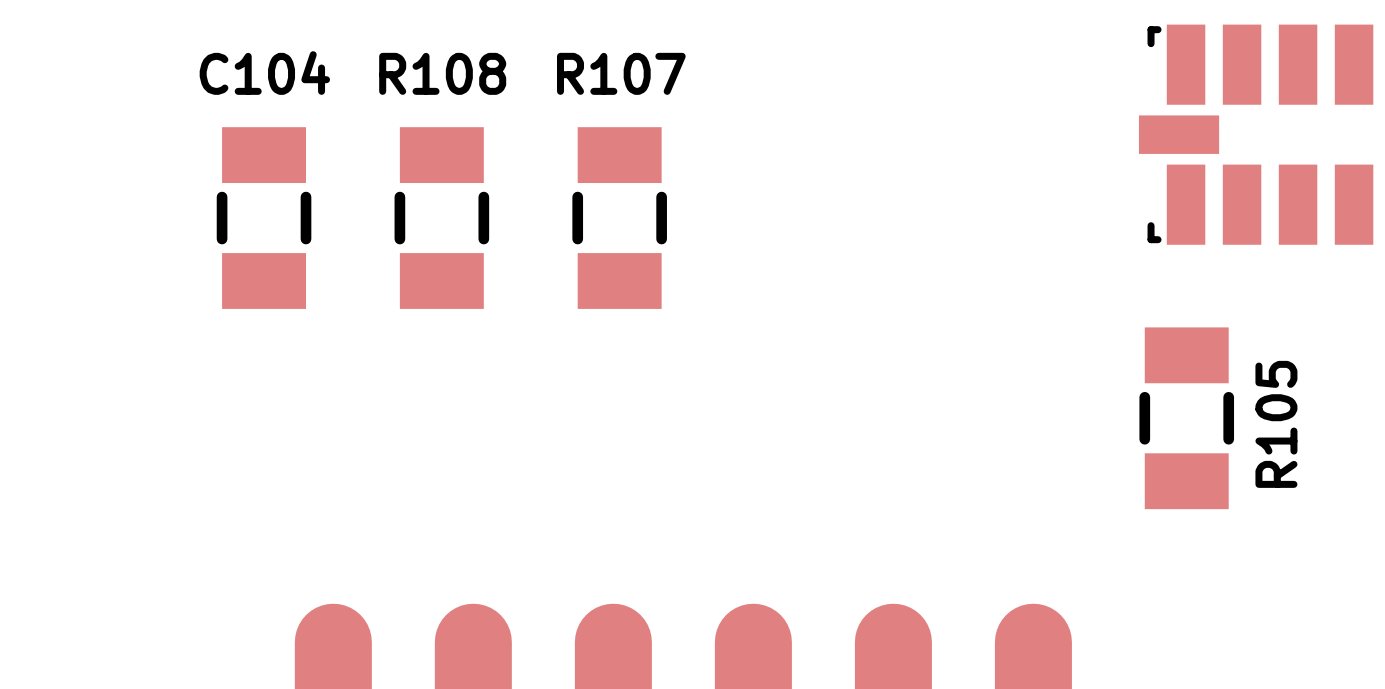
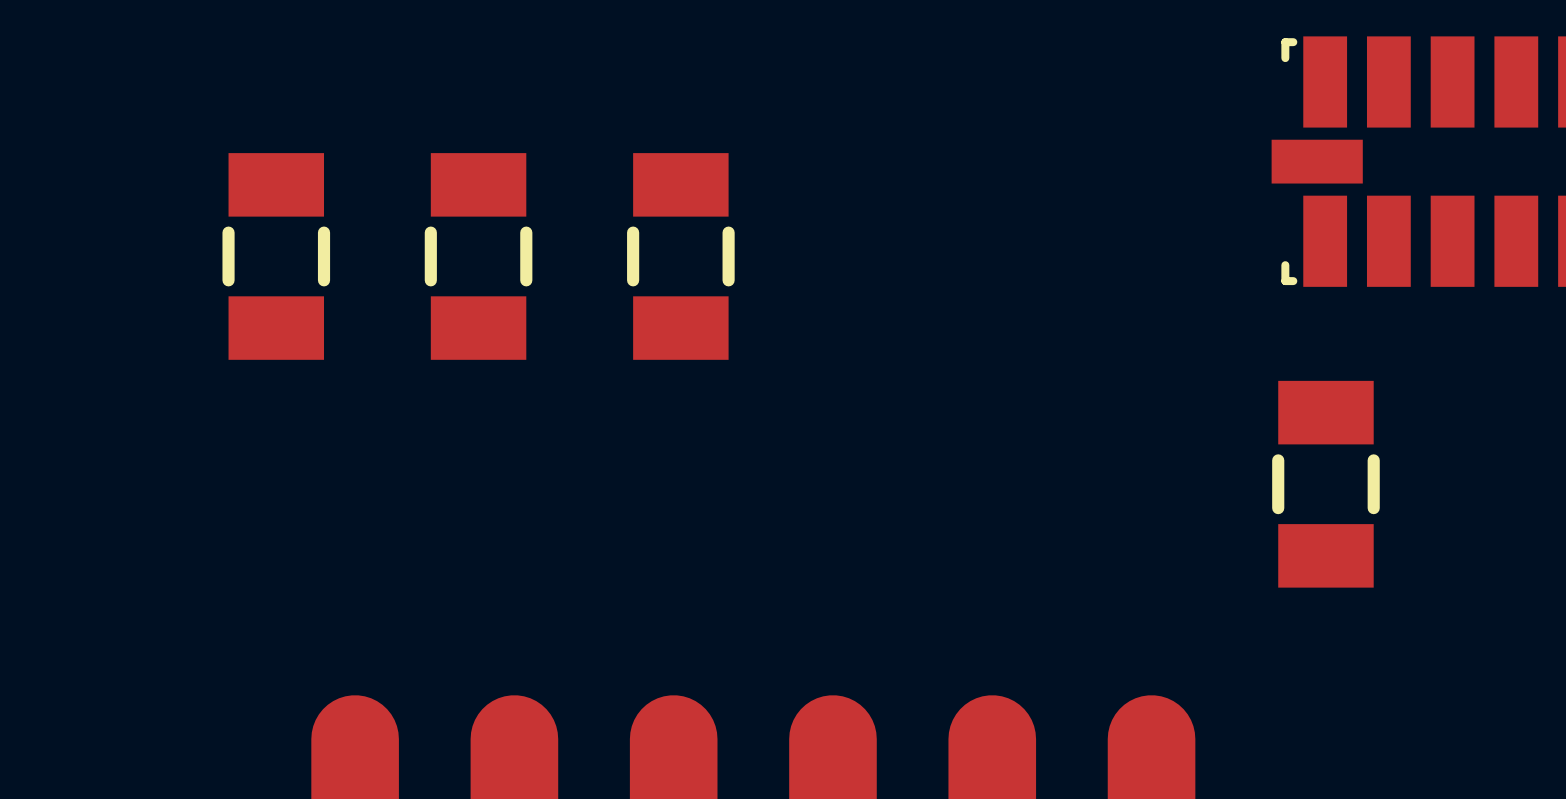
C104 name: C104 (264, 73) -> none
R108 name: R108 (442, 73) -> none
R107 name: R107 (621, 73) -> none
R105 name: R105 (1276, 424) -> none

